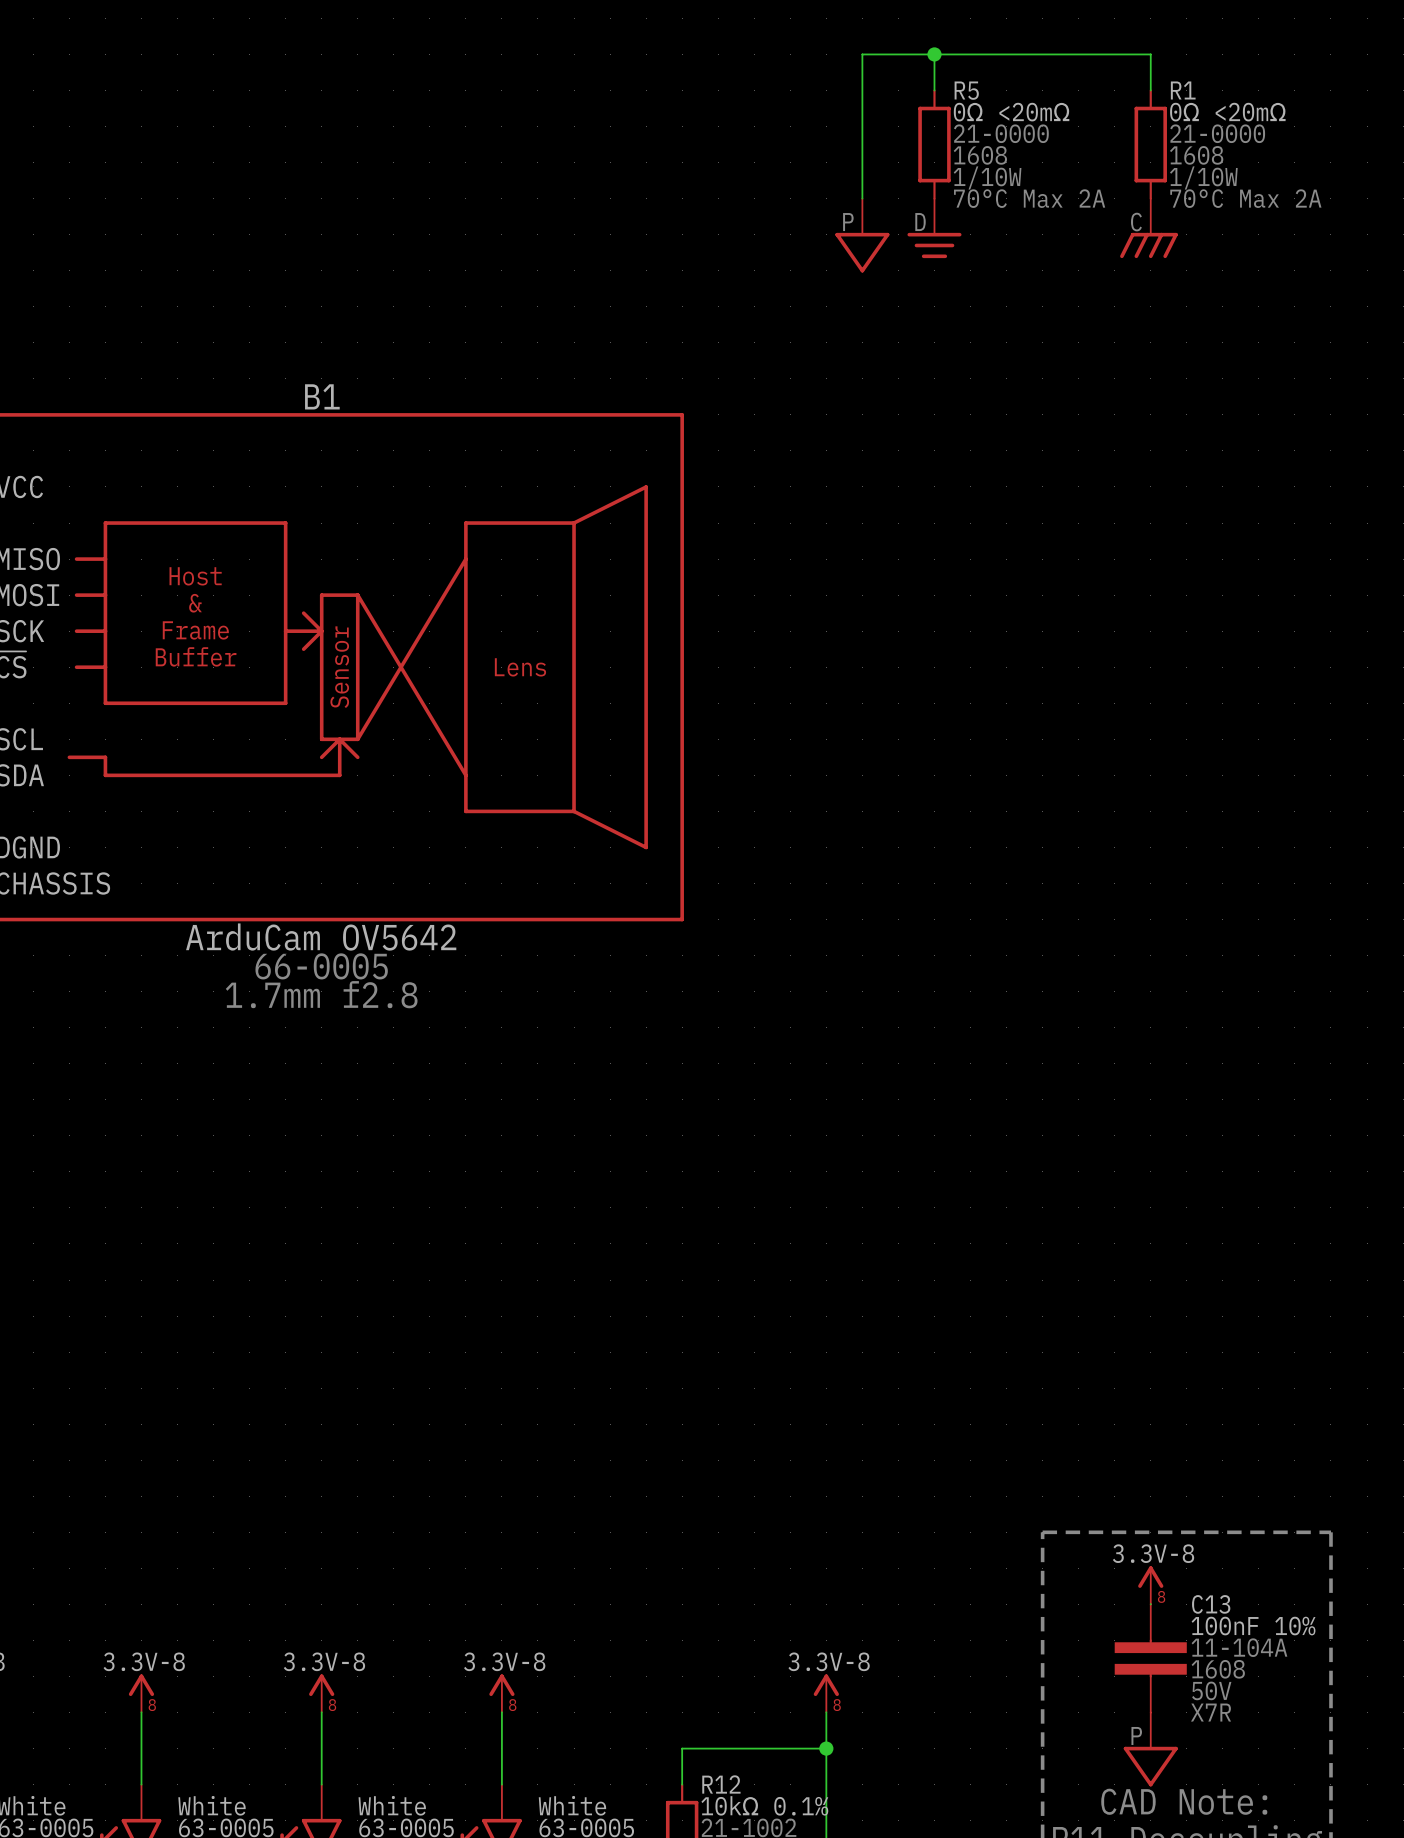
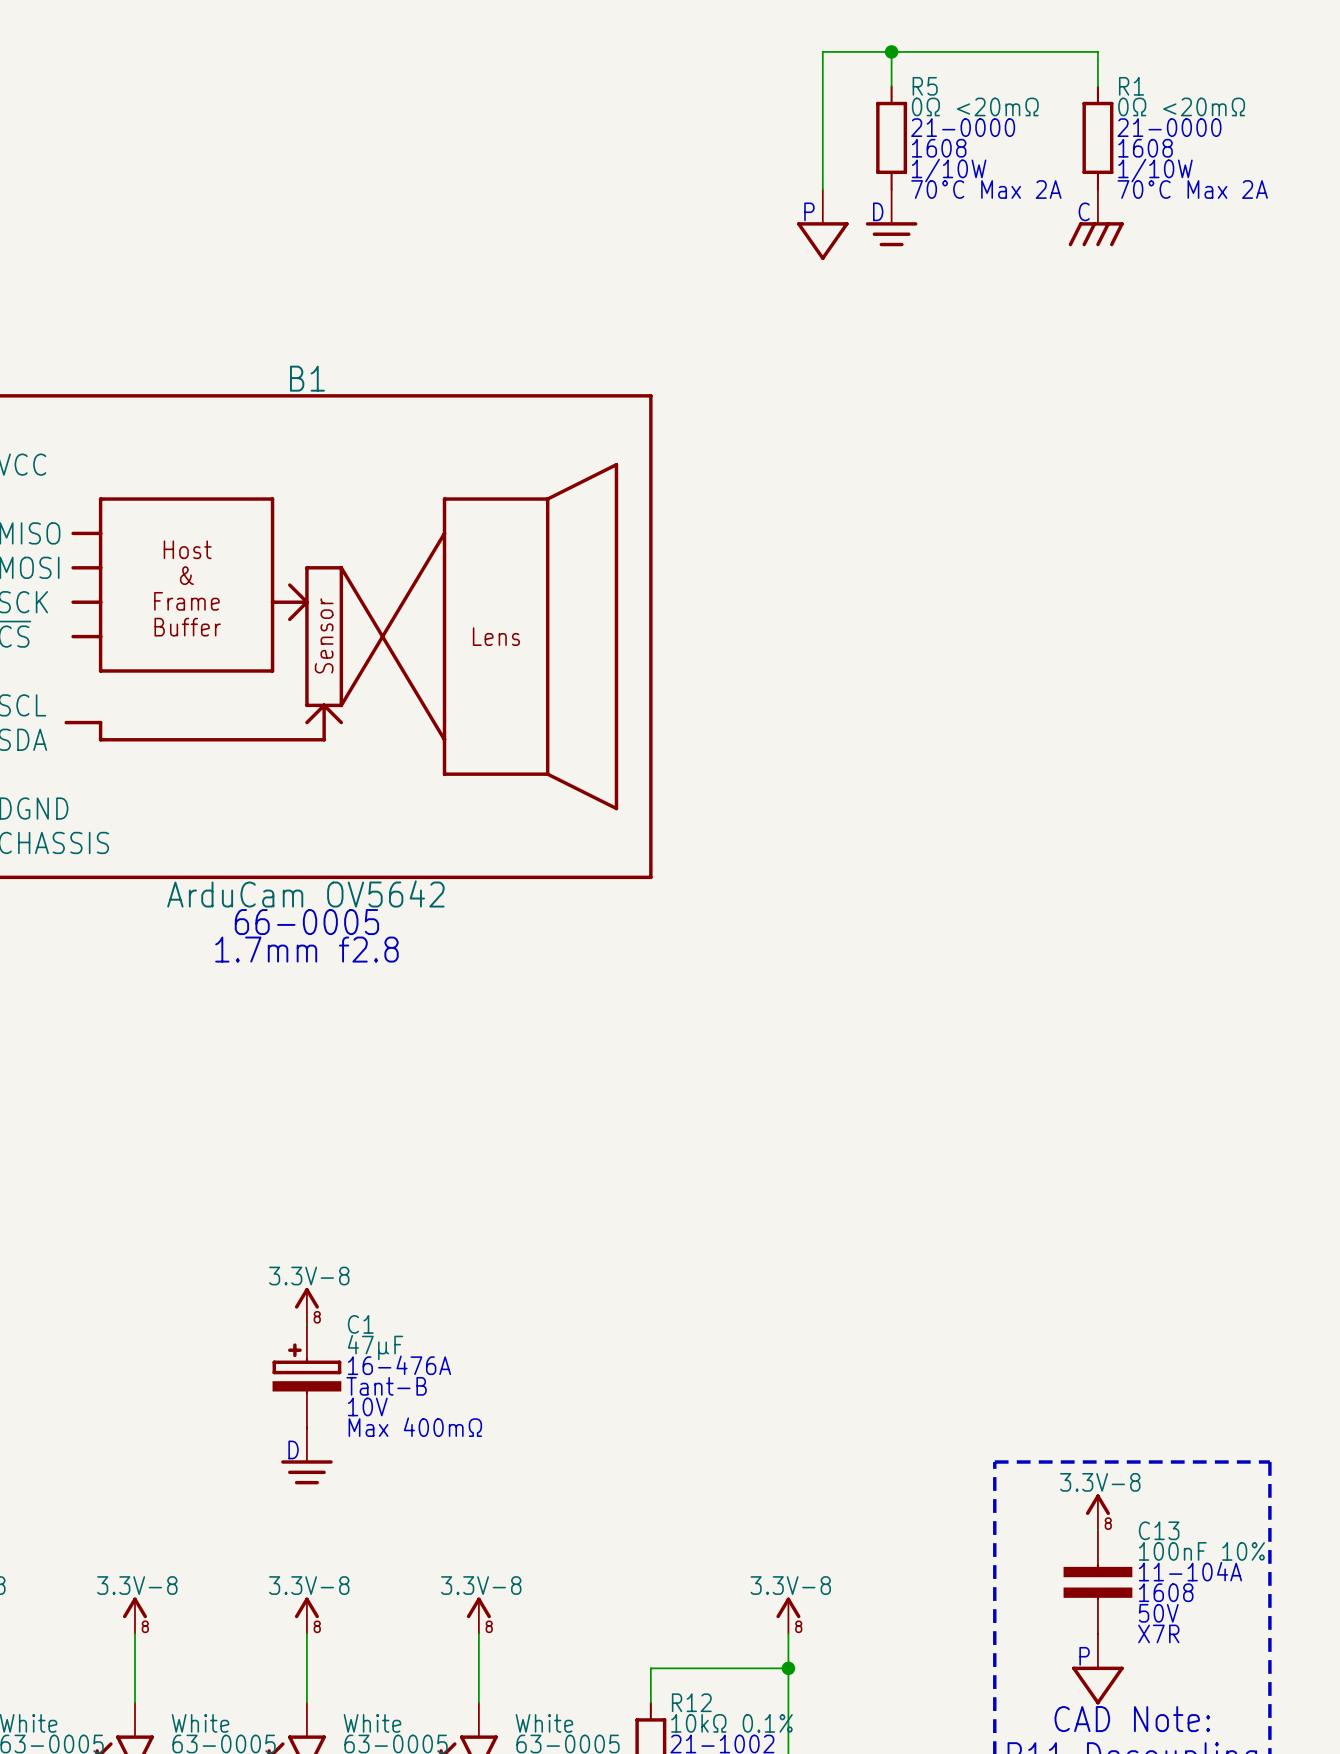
power symbol: none -> 3.3V-8 (306, 1306)
C1: none -> 47µF (306, 1376)
power symbol: none -> (306, 1455)

